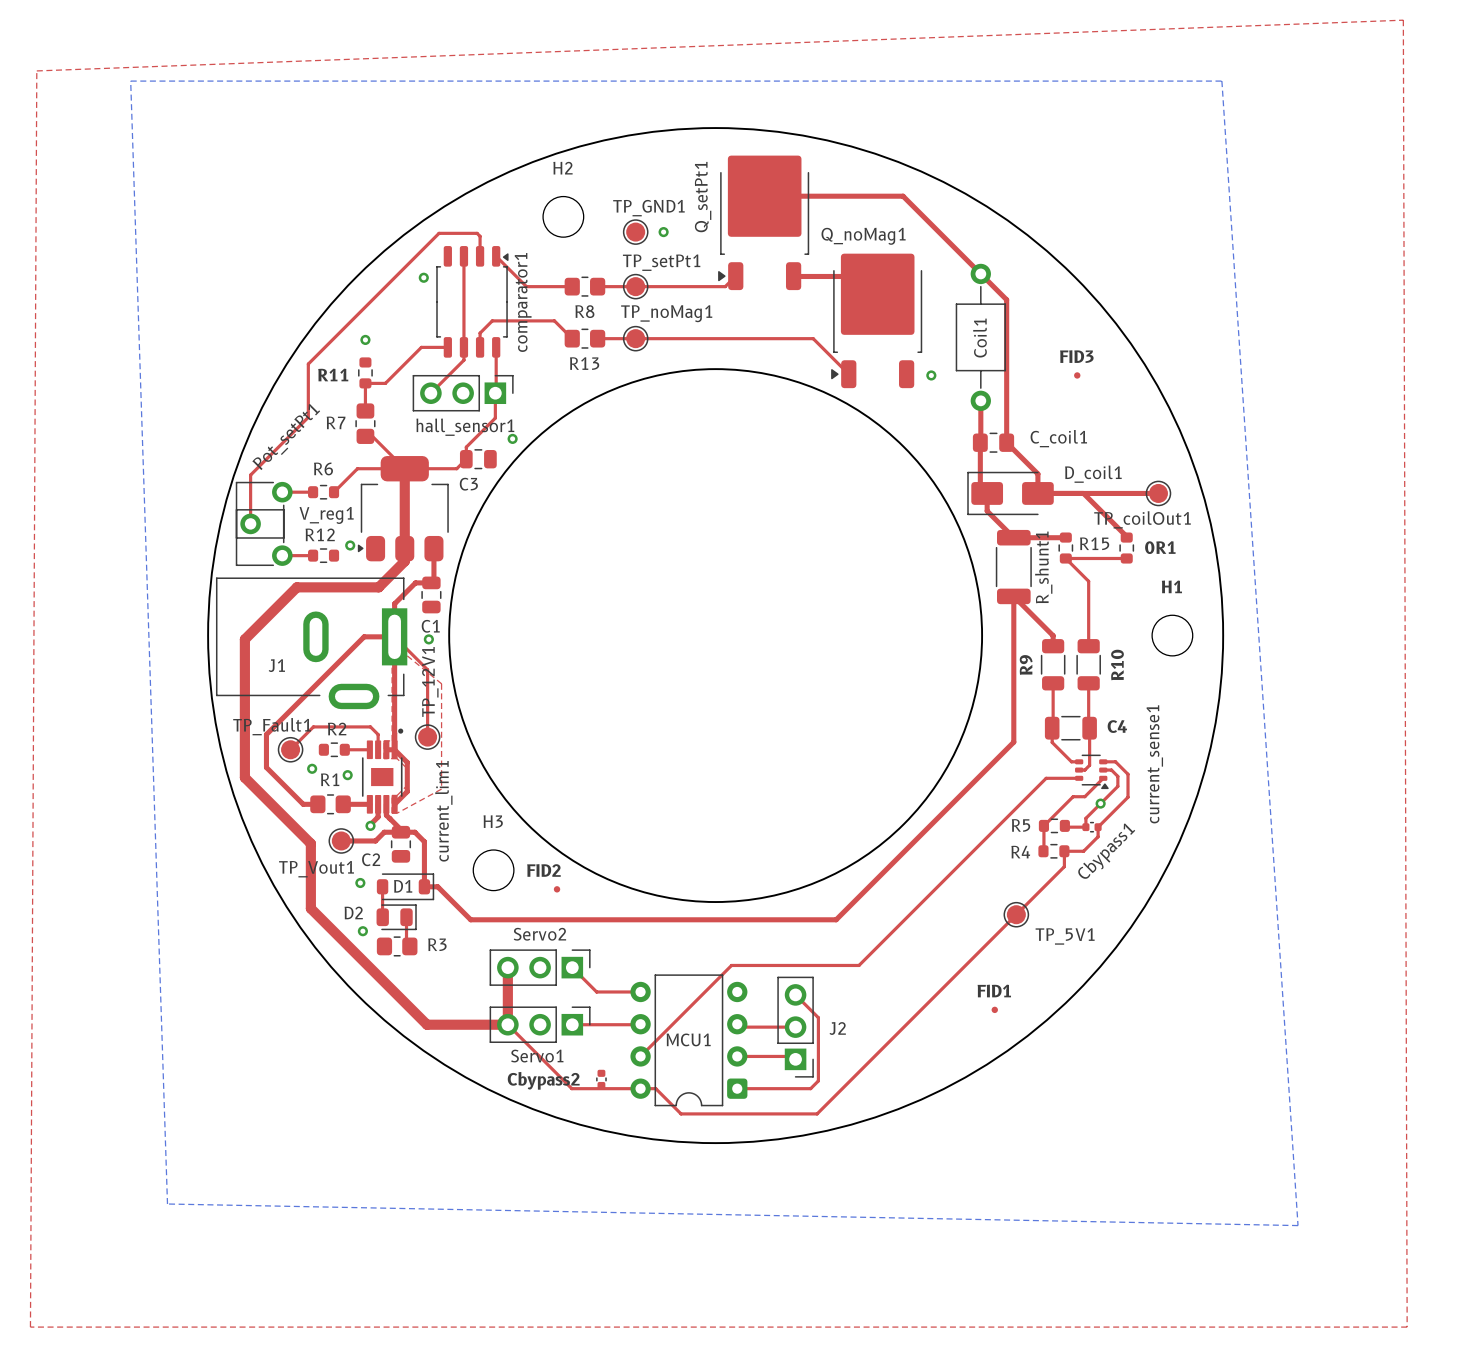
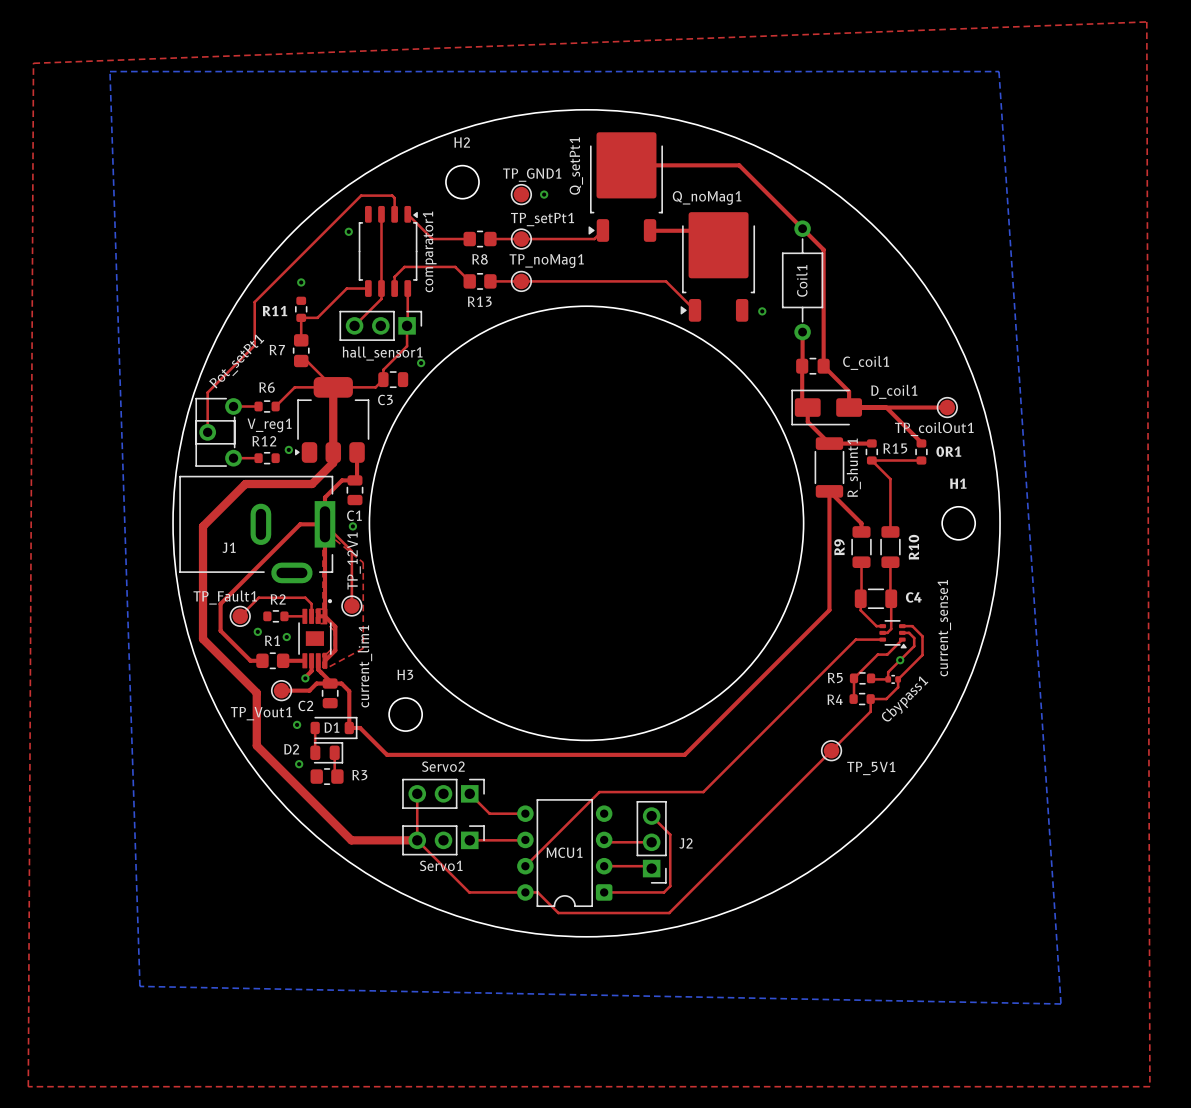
FID3: (1077, 375) -> none
FID2: (557, 889) -> none
top track width: thick (507, 967) (507, 1024) -> thin (417, 793) (417, 840)
FID1: (994, 1009) -> none
Cbypass2: (601, 1079) -> none

